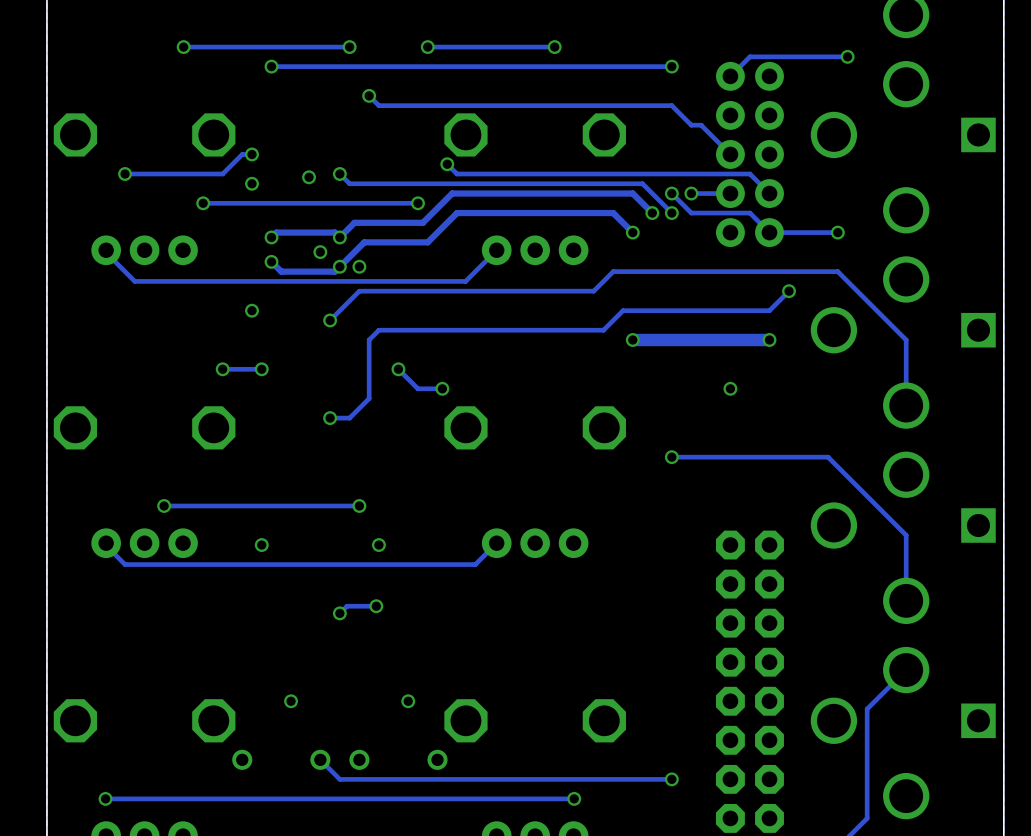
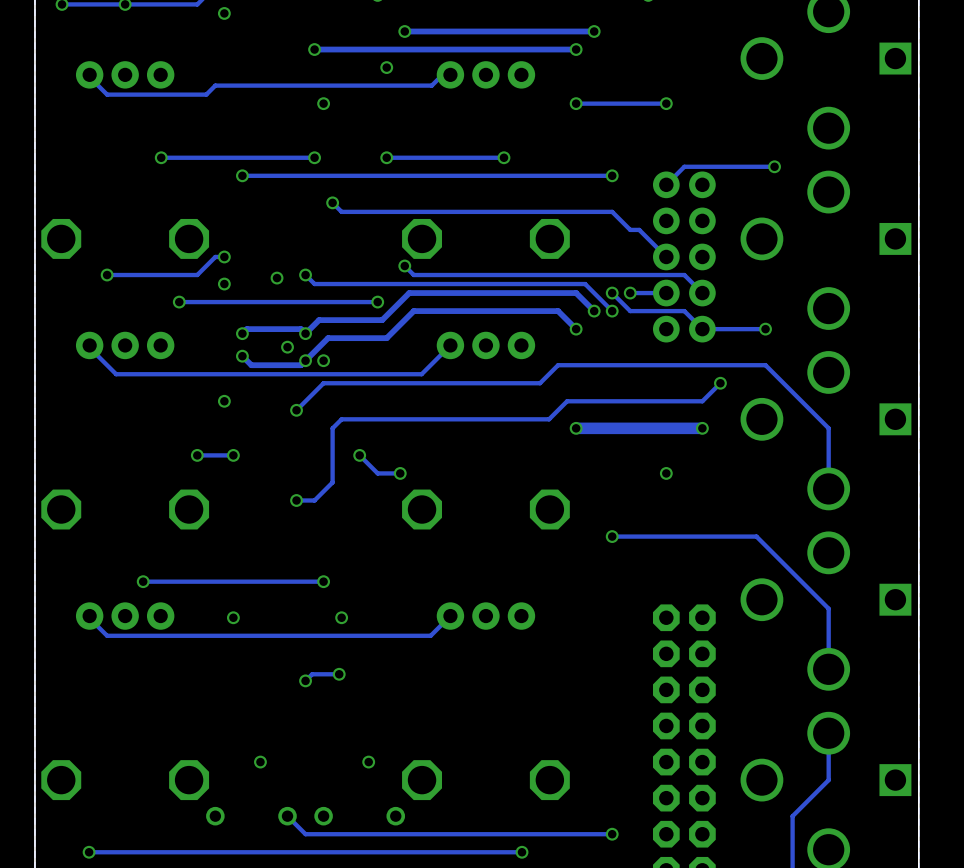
track: (906, 670) (867, 709) (867, 759) -> (828, 733) (828, 780) (792, 816)

